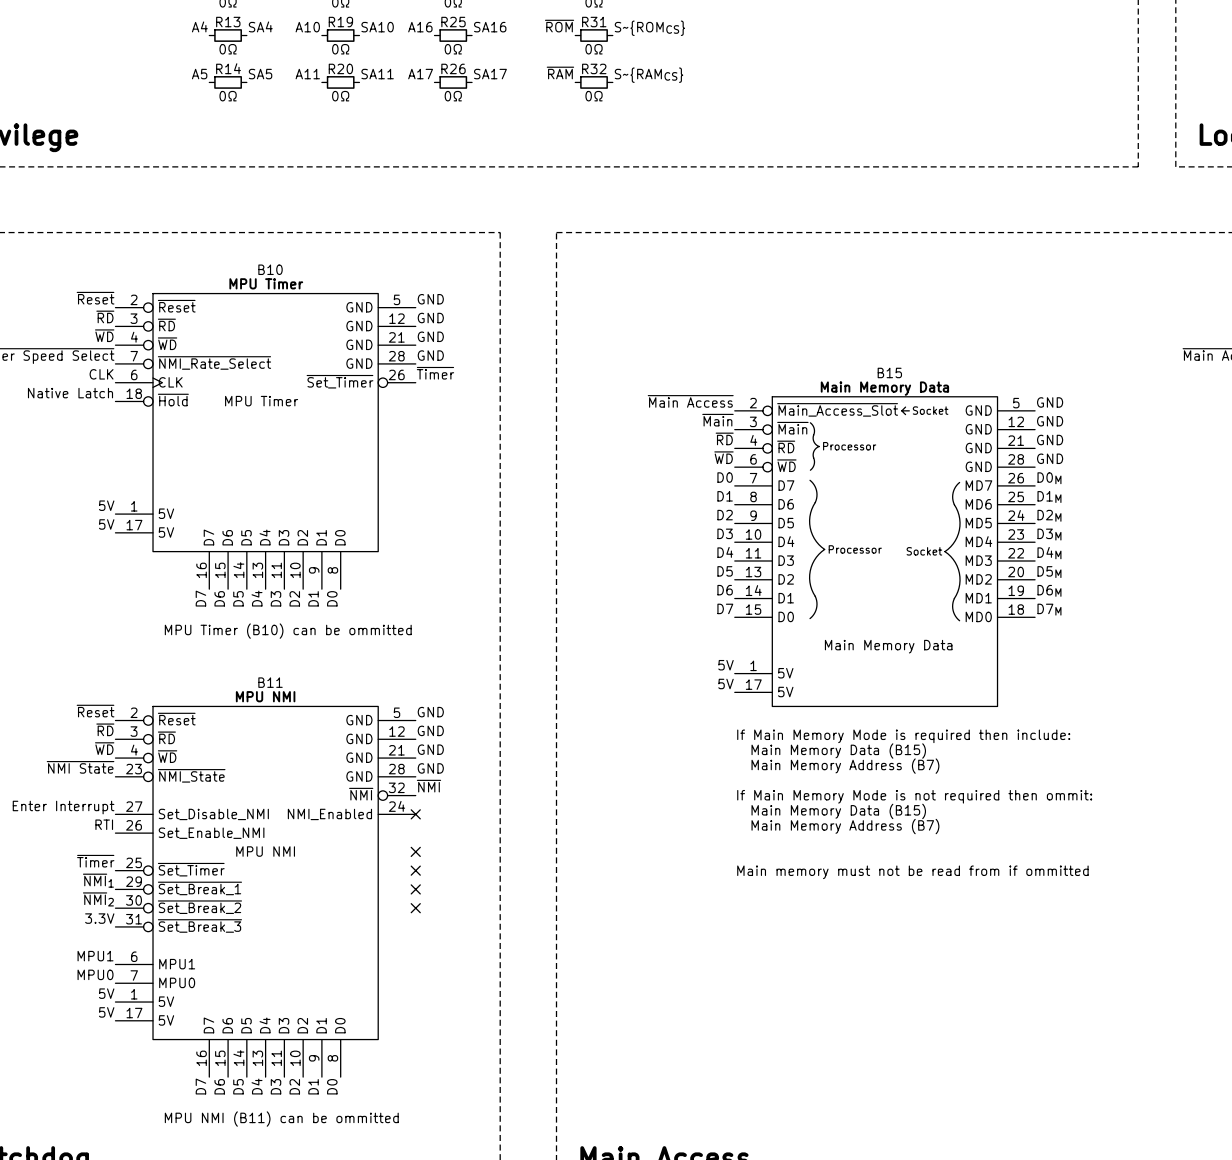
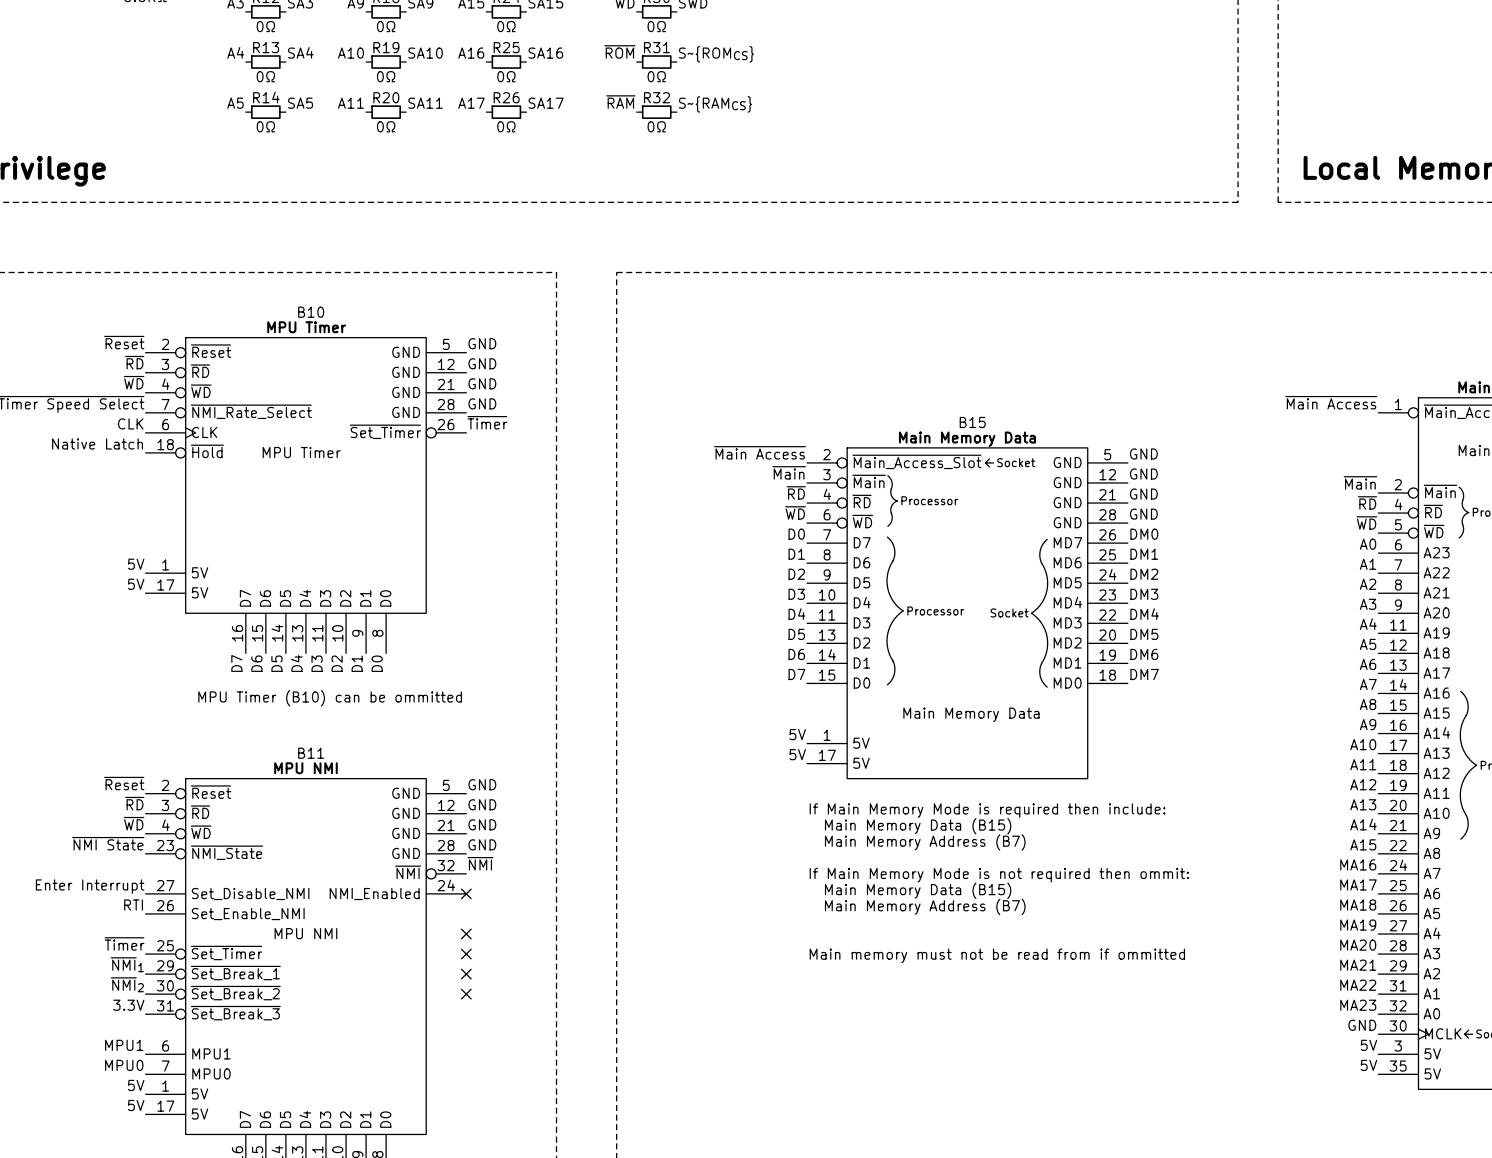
label: D0M (1049, 478) -> DM0 (1144, 534)
label: D1M (1049, 497) -> DM1 (1144, 554)
label: D2M (1049, 515) -> DM2 (1144, 574)
label: D3M (1049, 534) -> DM3 (1144, 594)
label: D4M (1049, 553) -> DM4 (1144, 614)
label: D5M (1049, 572) -> DM5 (1144, 634)
label: D6M (1049, 590) -> DM6 (1144, 654)
label: D7M (1049, 609) -> DM7 (1144, 674)

